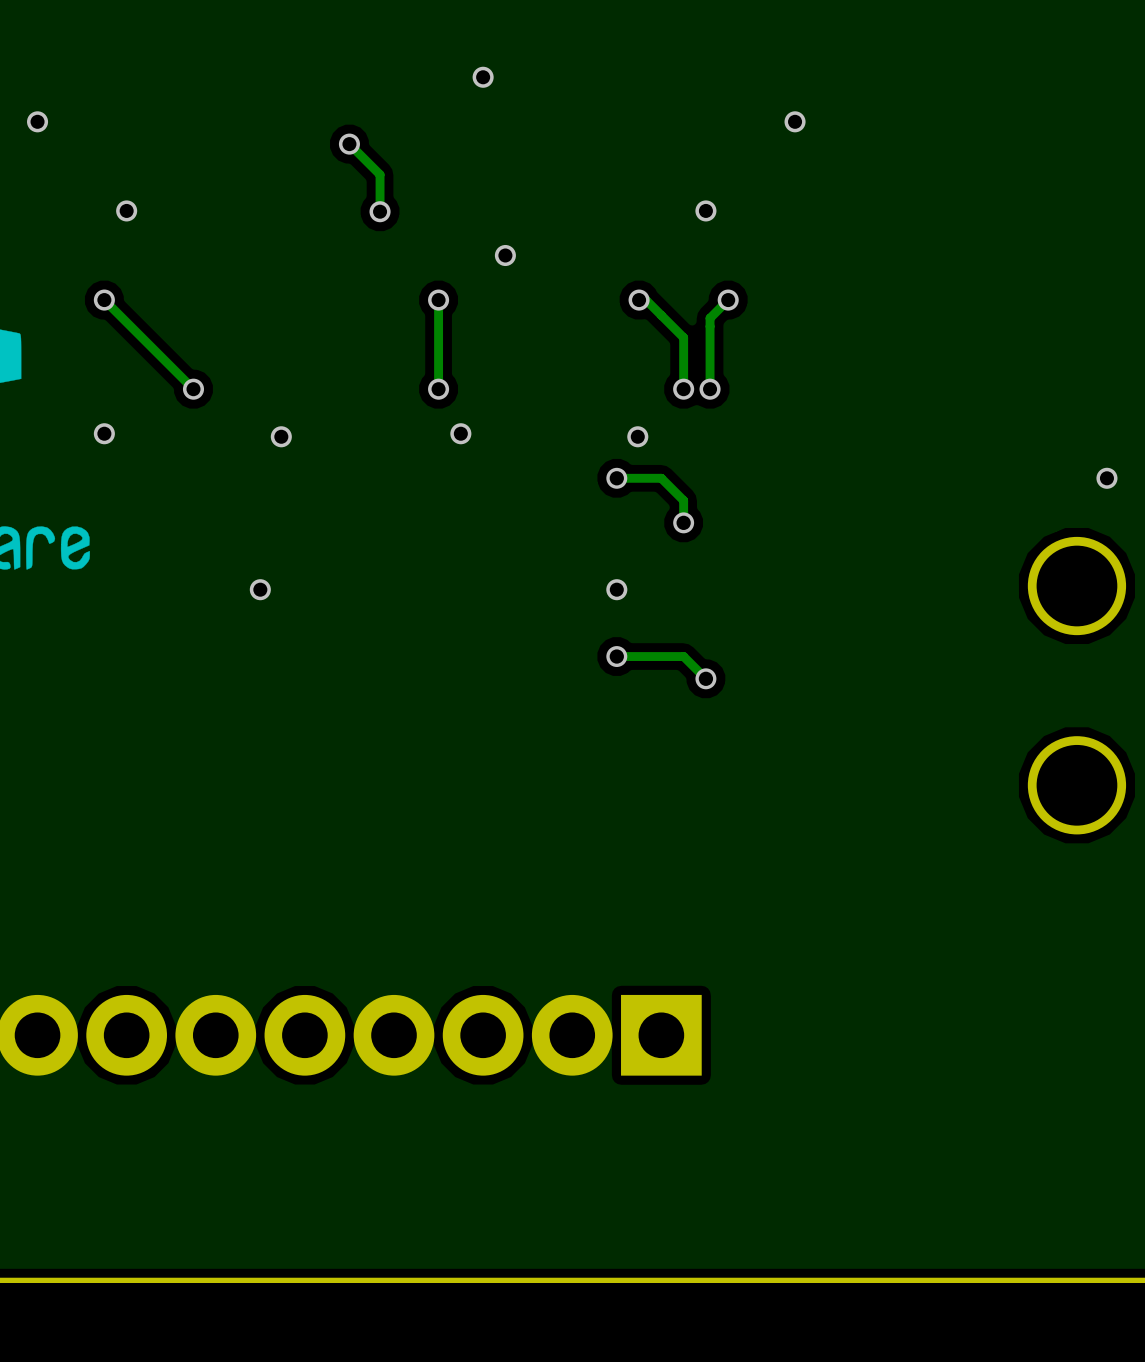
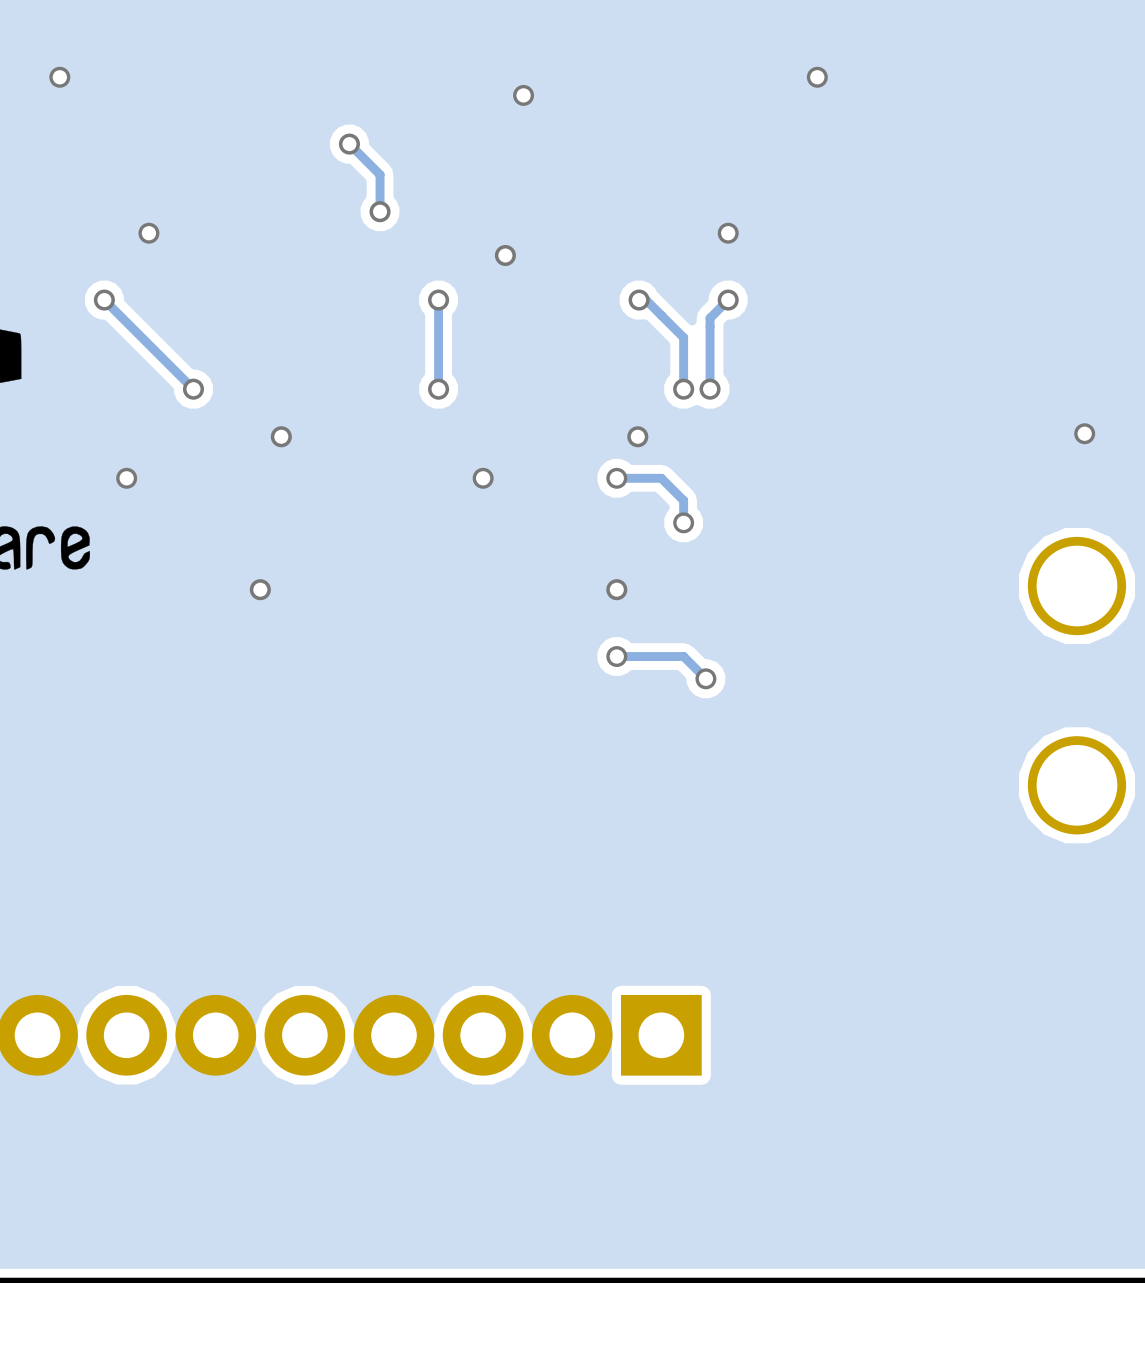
via position: (483, 77) -> (523, 95)
via position: (37, 121) -> (59, 77)
via position: (795, 121) -> (817, 77)
via position: (126, 210) -> (148, 233)
via position: (705, 210) -> (728, 233)
via position: (104, 433) -> (126, 478)
via position: (460, 433) -> (483, 478)
via position: (1106, 478) -> (1084, 433)

